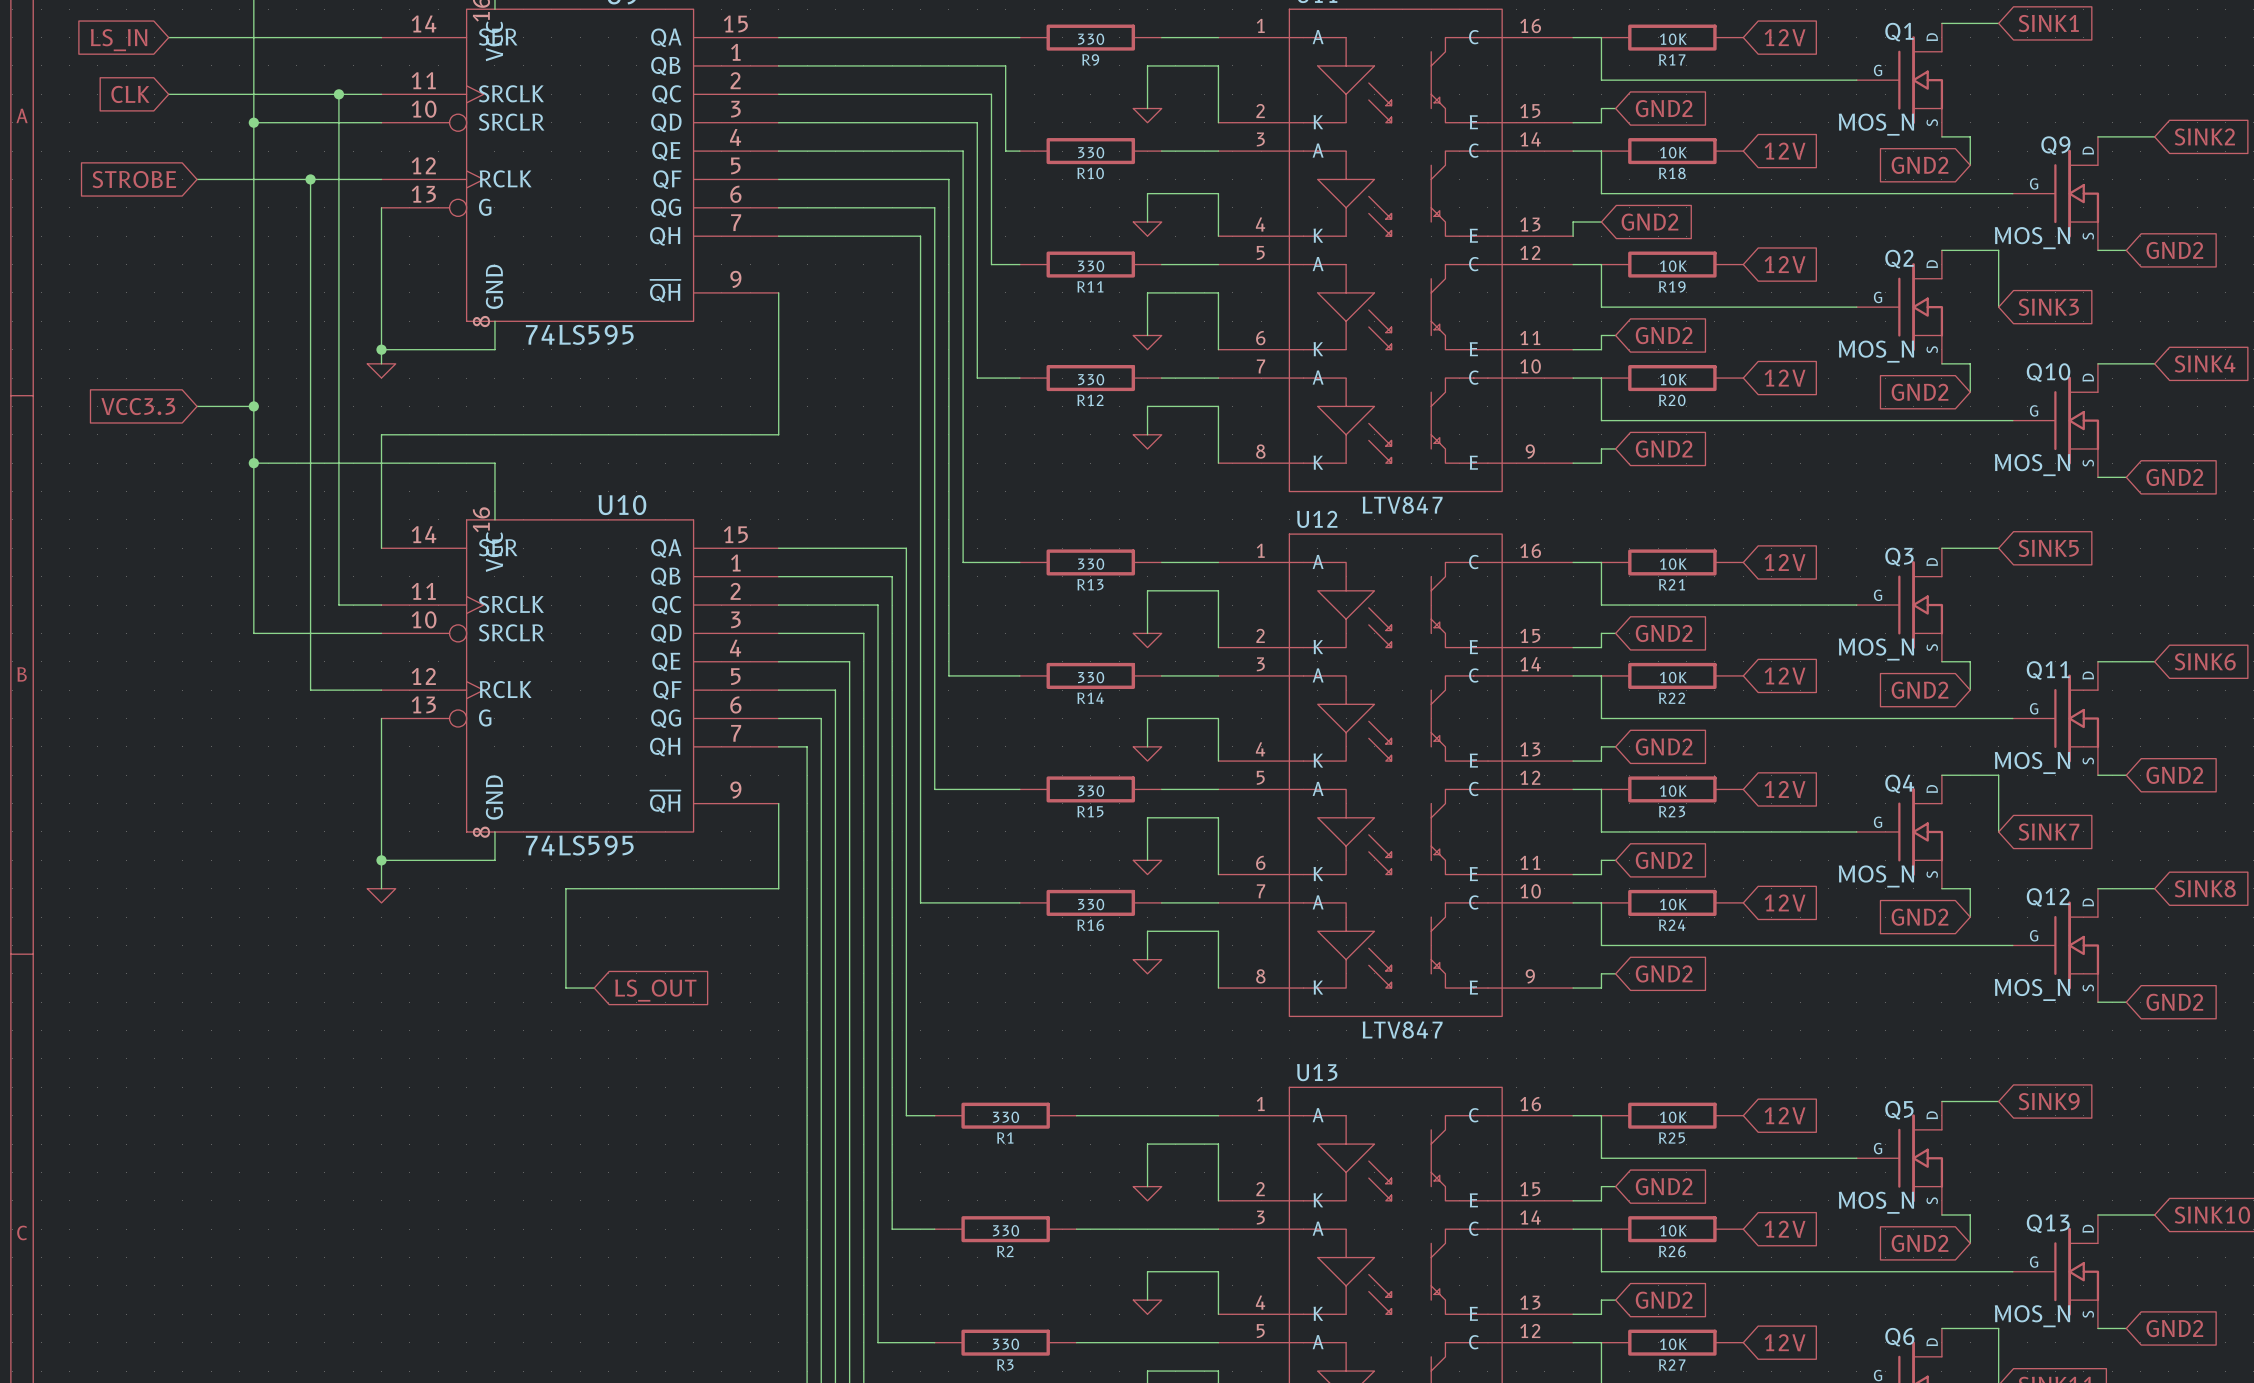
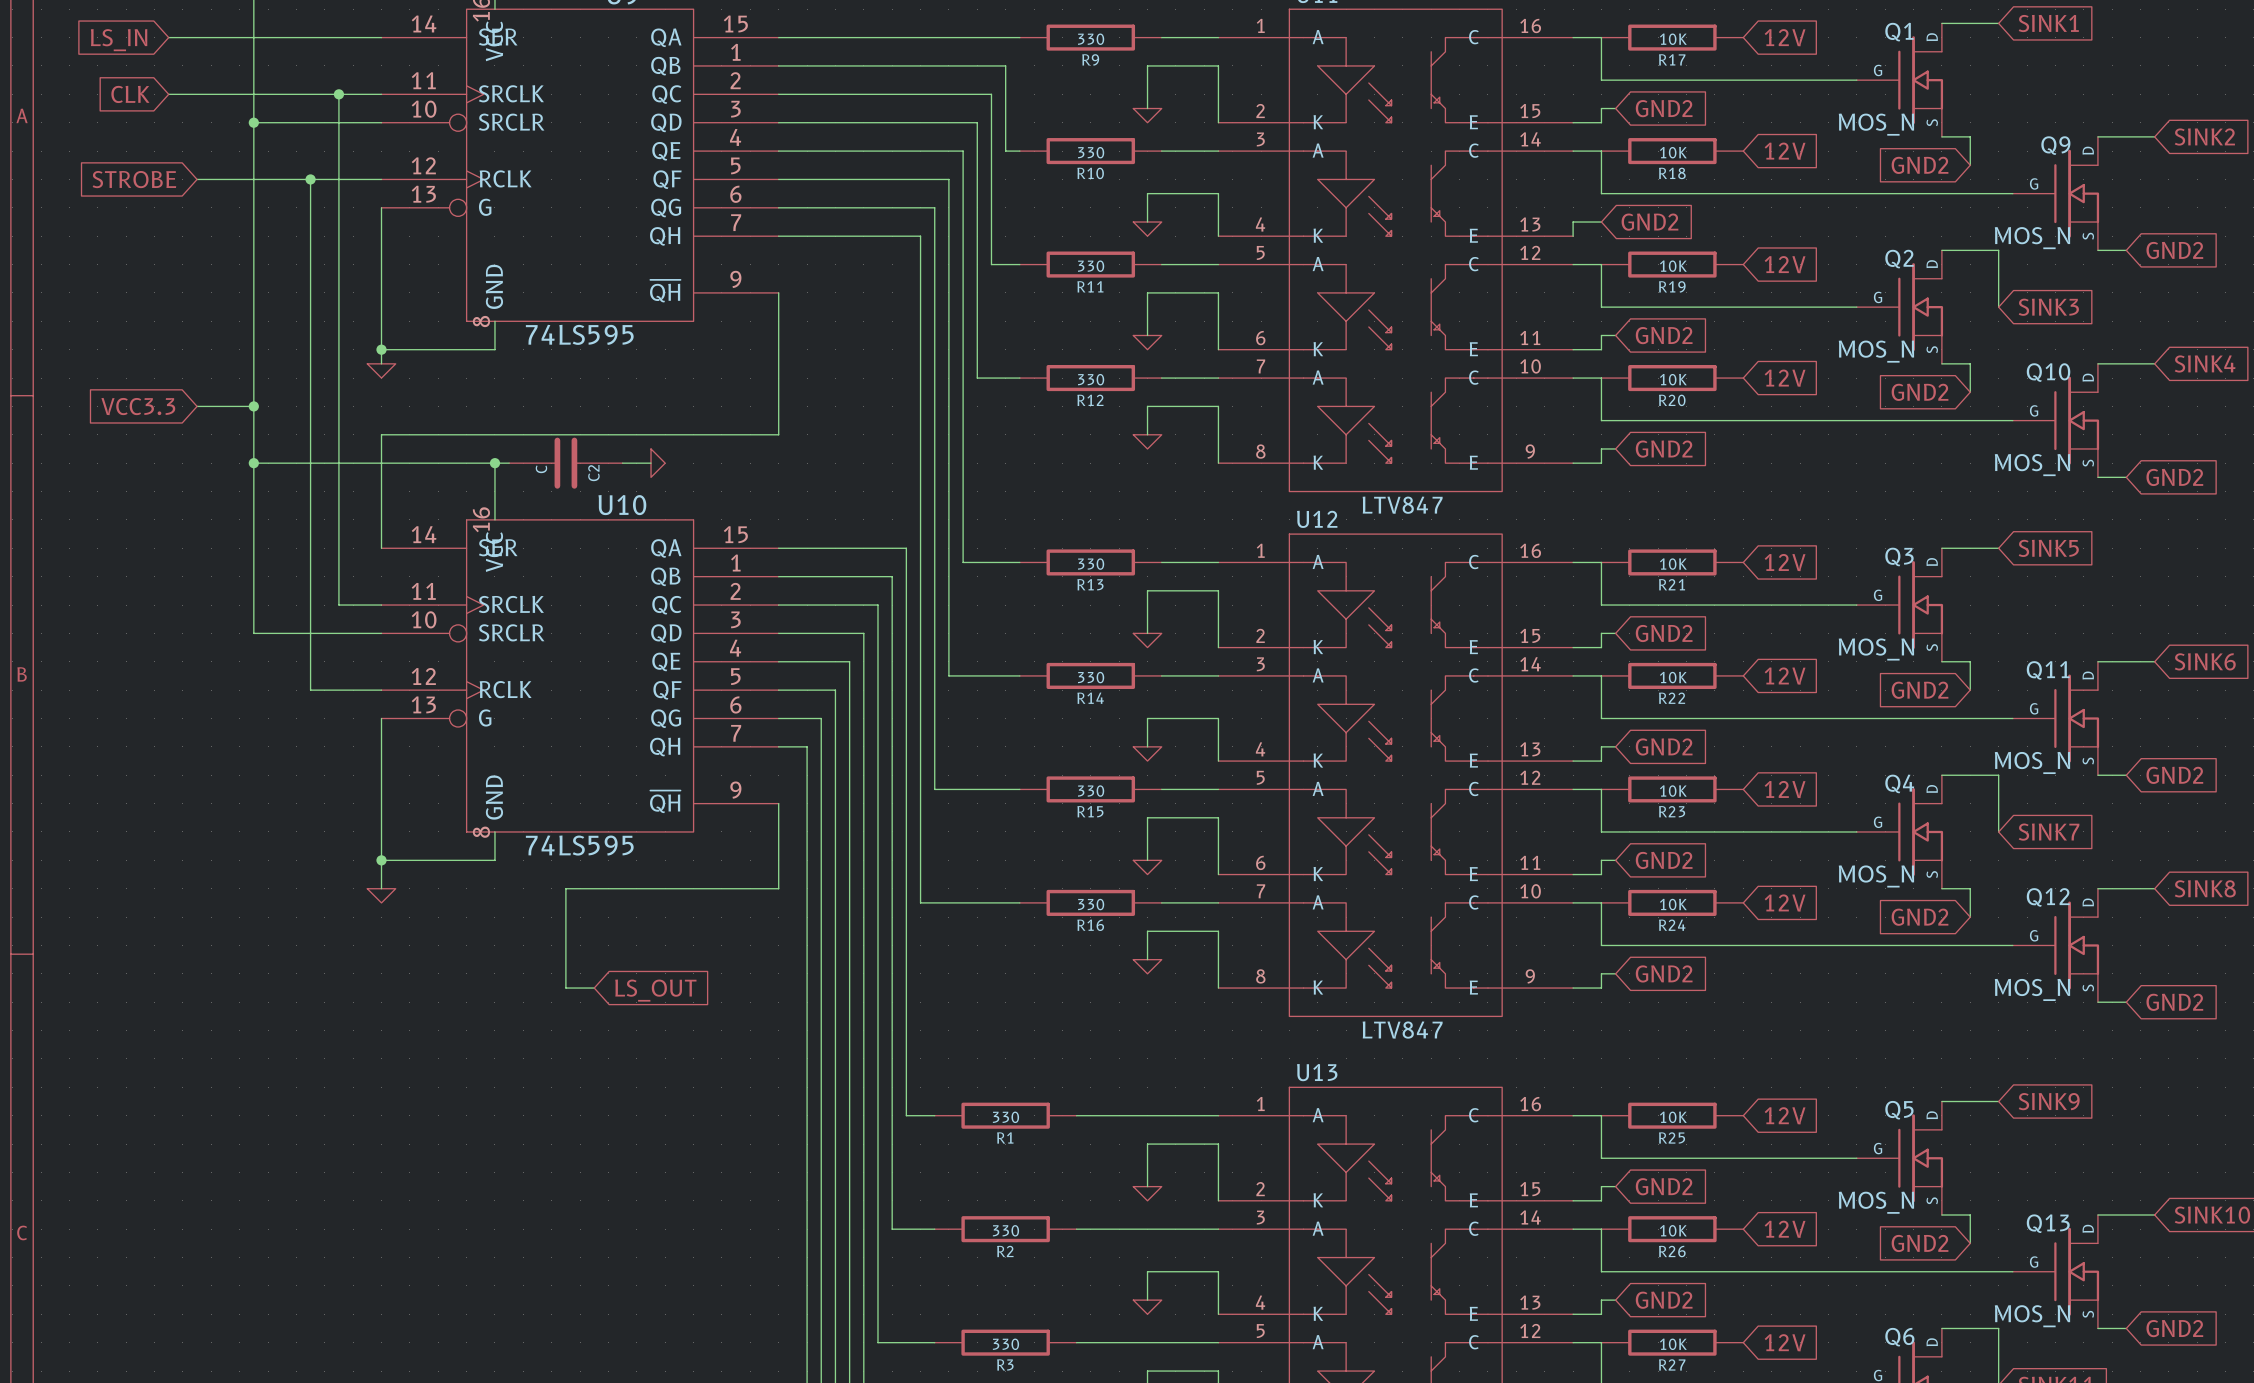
wire: none -> (494, 463) (509, 463)
junction: none -> (494, 463)
C2: none -> C (565, 463)
wire: none -> (622, 463) (651, 463)
power symbol: none -> (658, 463)

